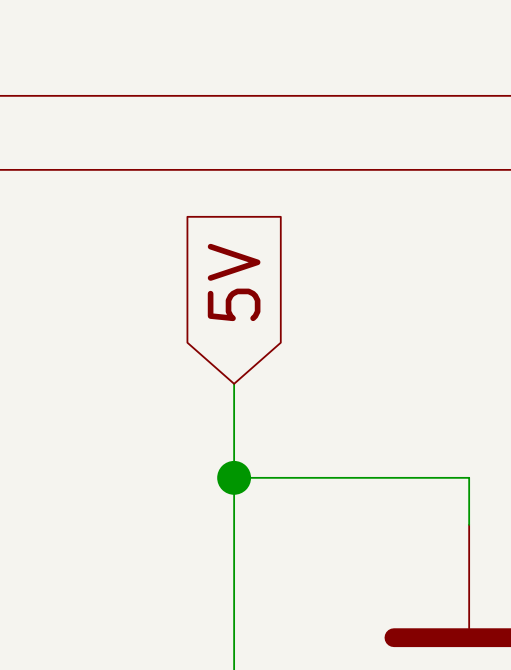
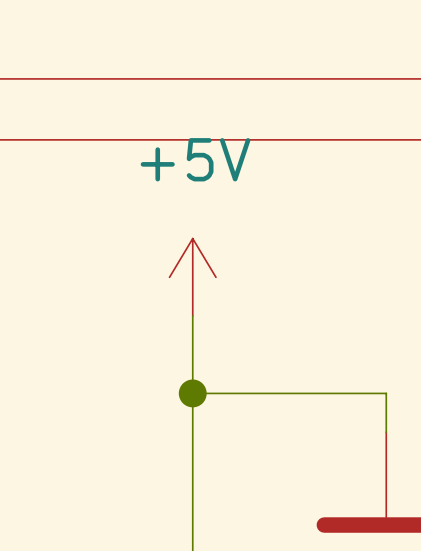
global label: 5V (234, 282) -> none
power symbol: none -> +5V (192, 277)

